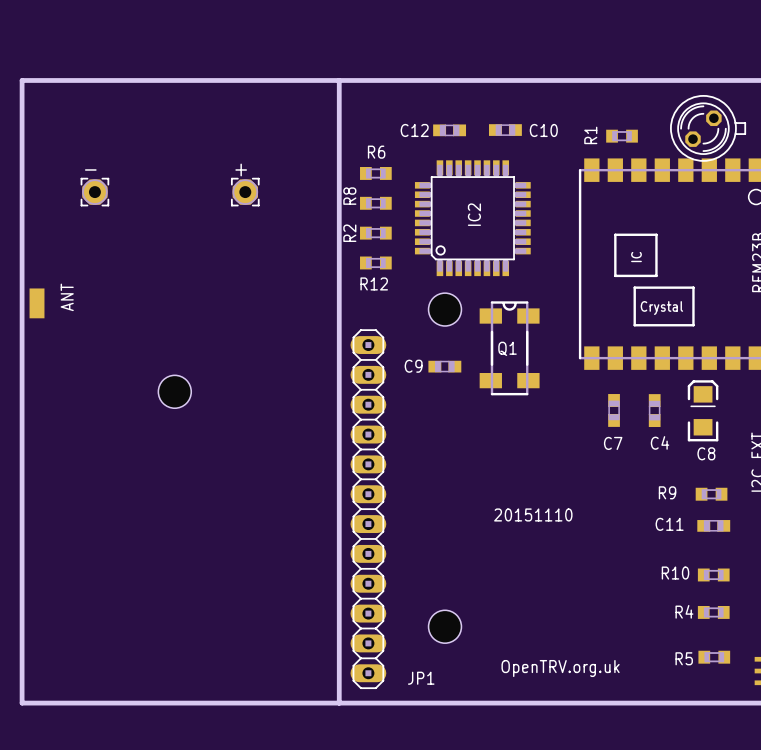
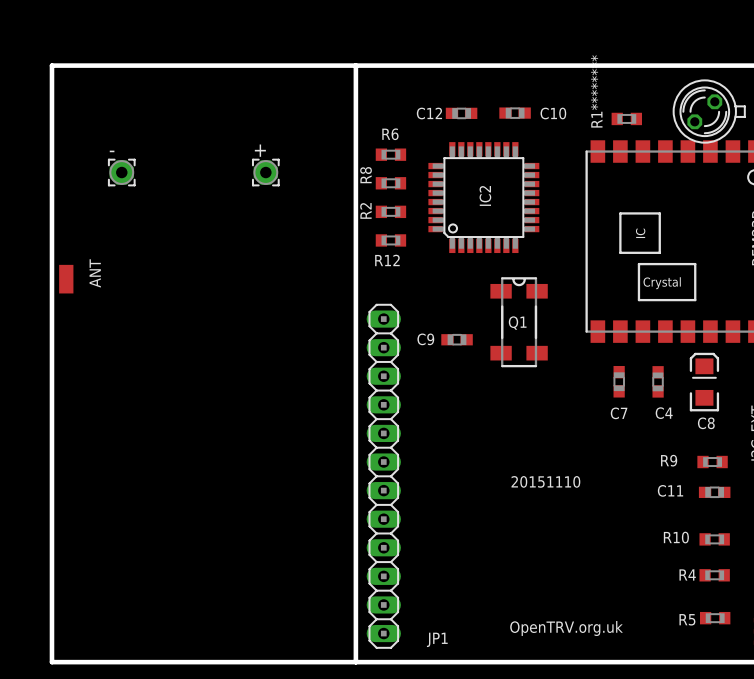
R1 name: R1 (590, 135) -> R1******** (596, 91)
hole: (445, 309) -> none
hole: (174, 391) -> none
hole: (445, 626) -> none

